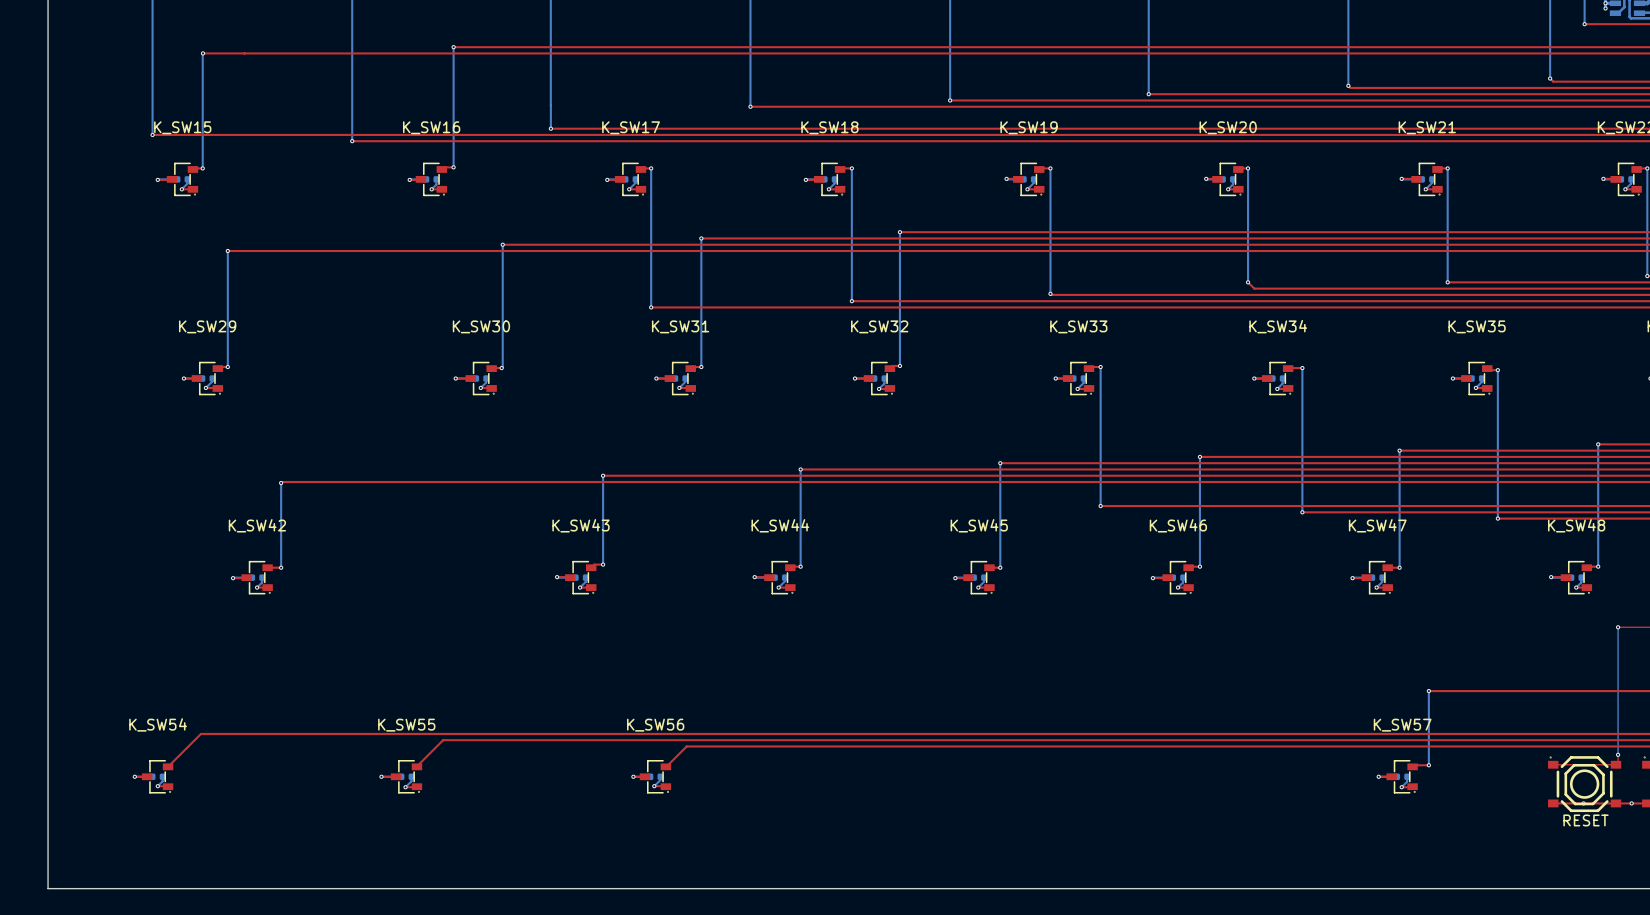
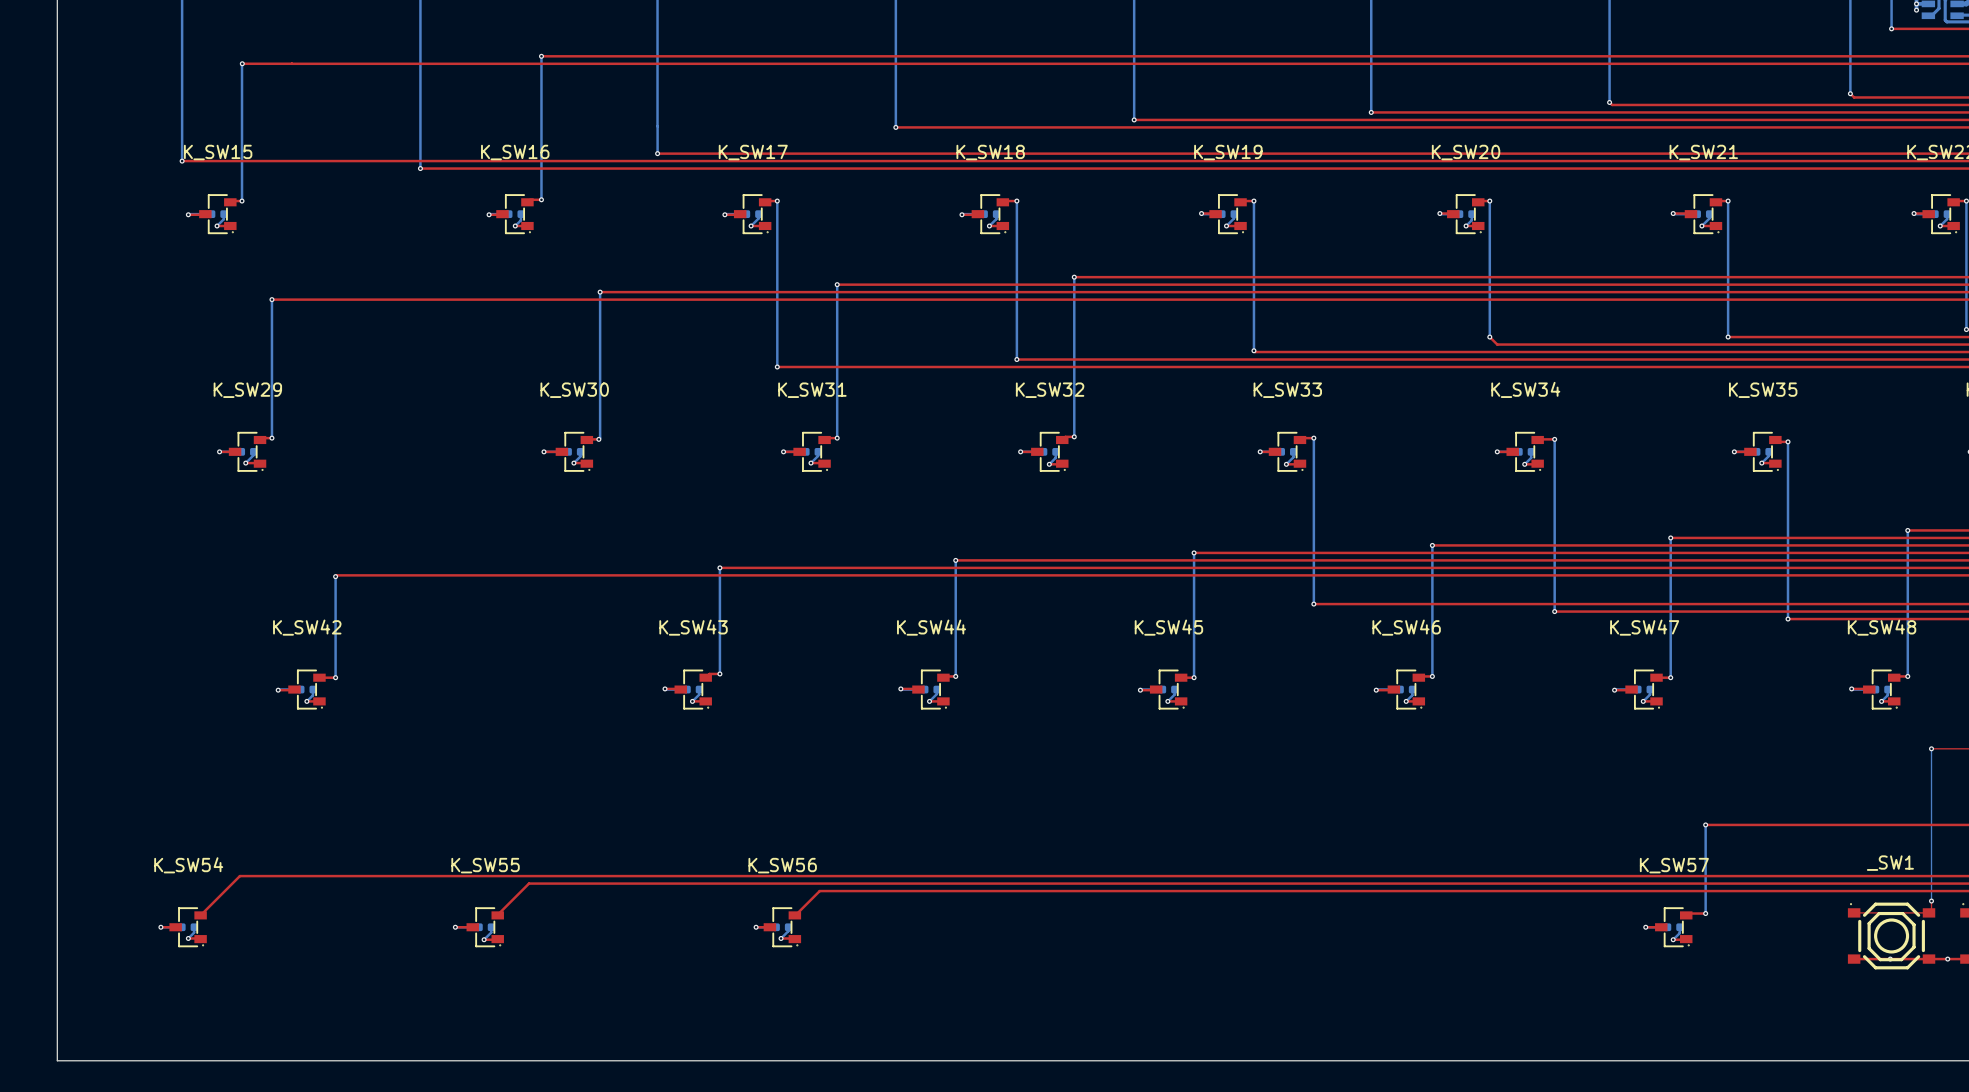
_SW1 name: none -> _SW1 (1890, 863)
text: RESET (1586, 820) -> none

